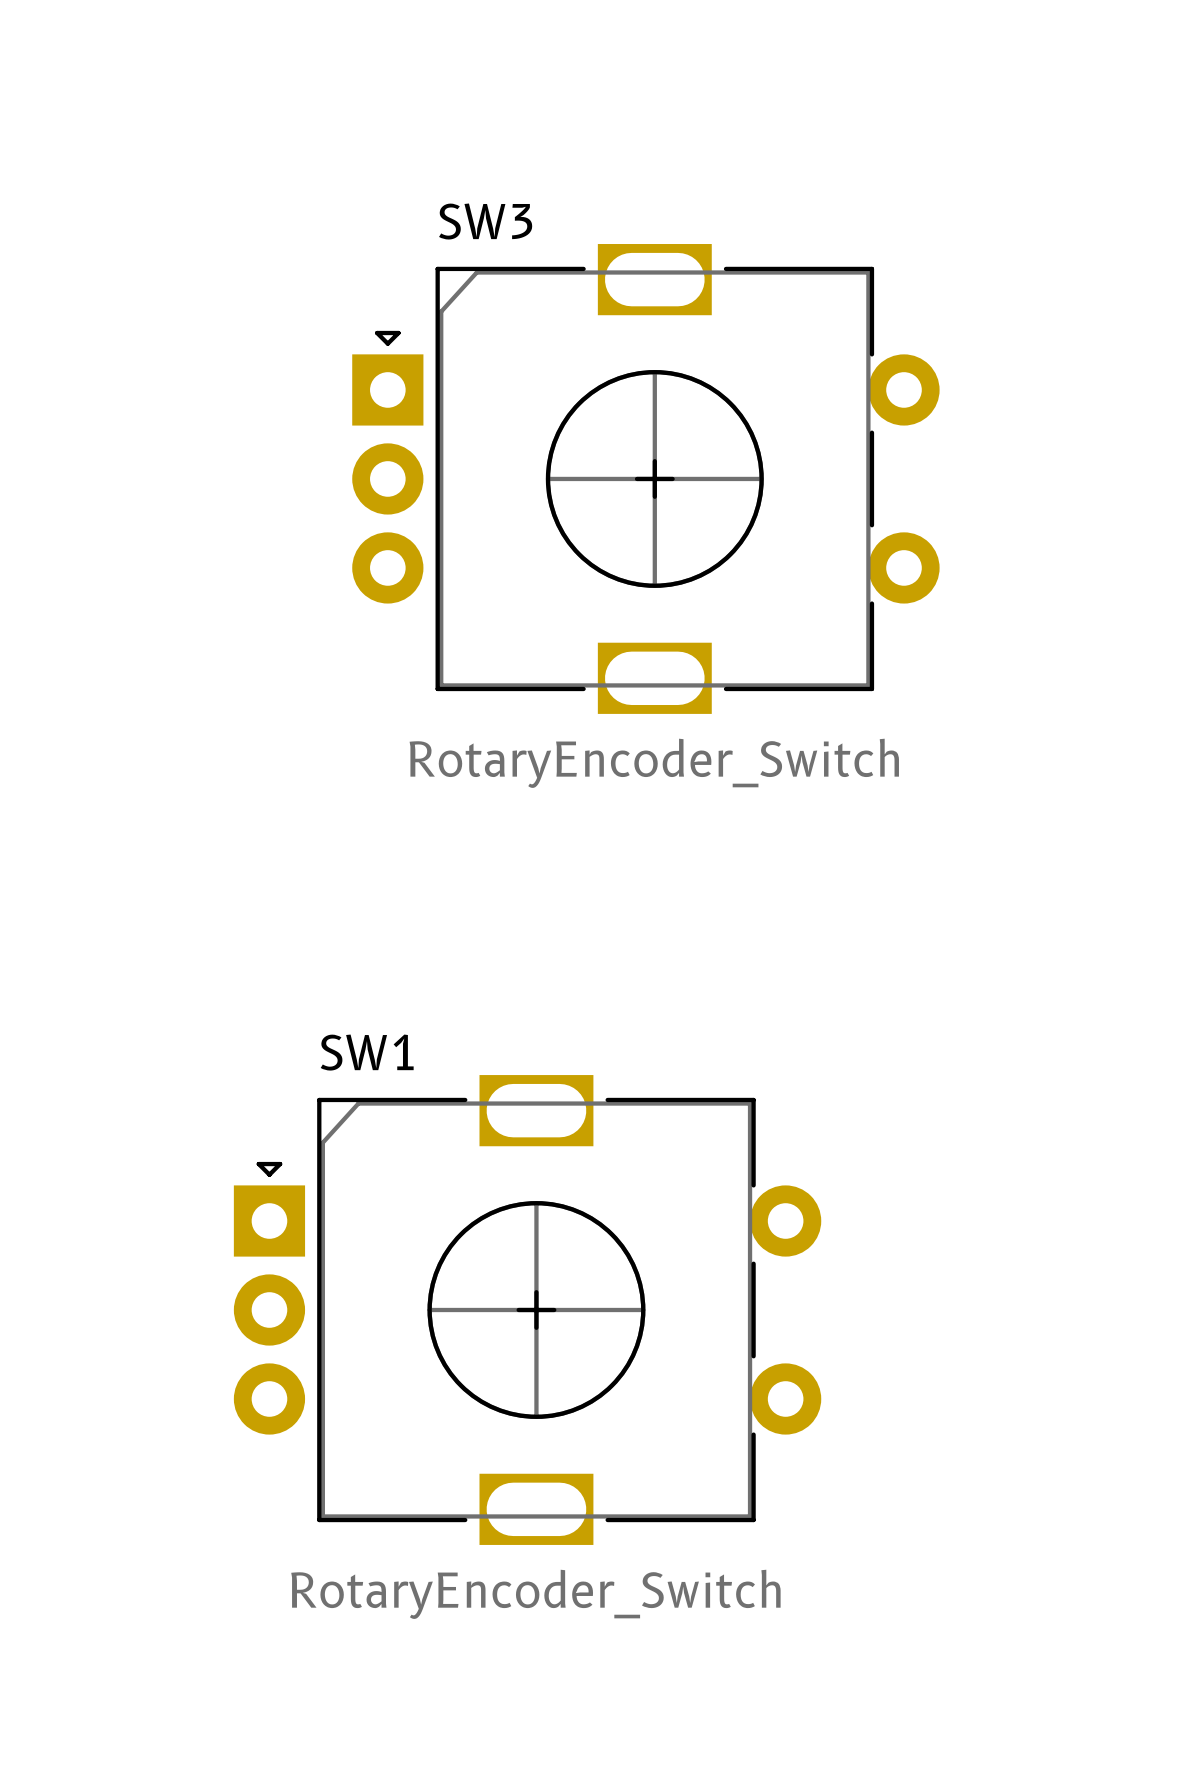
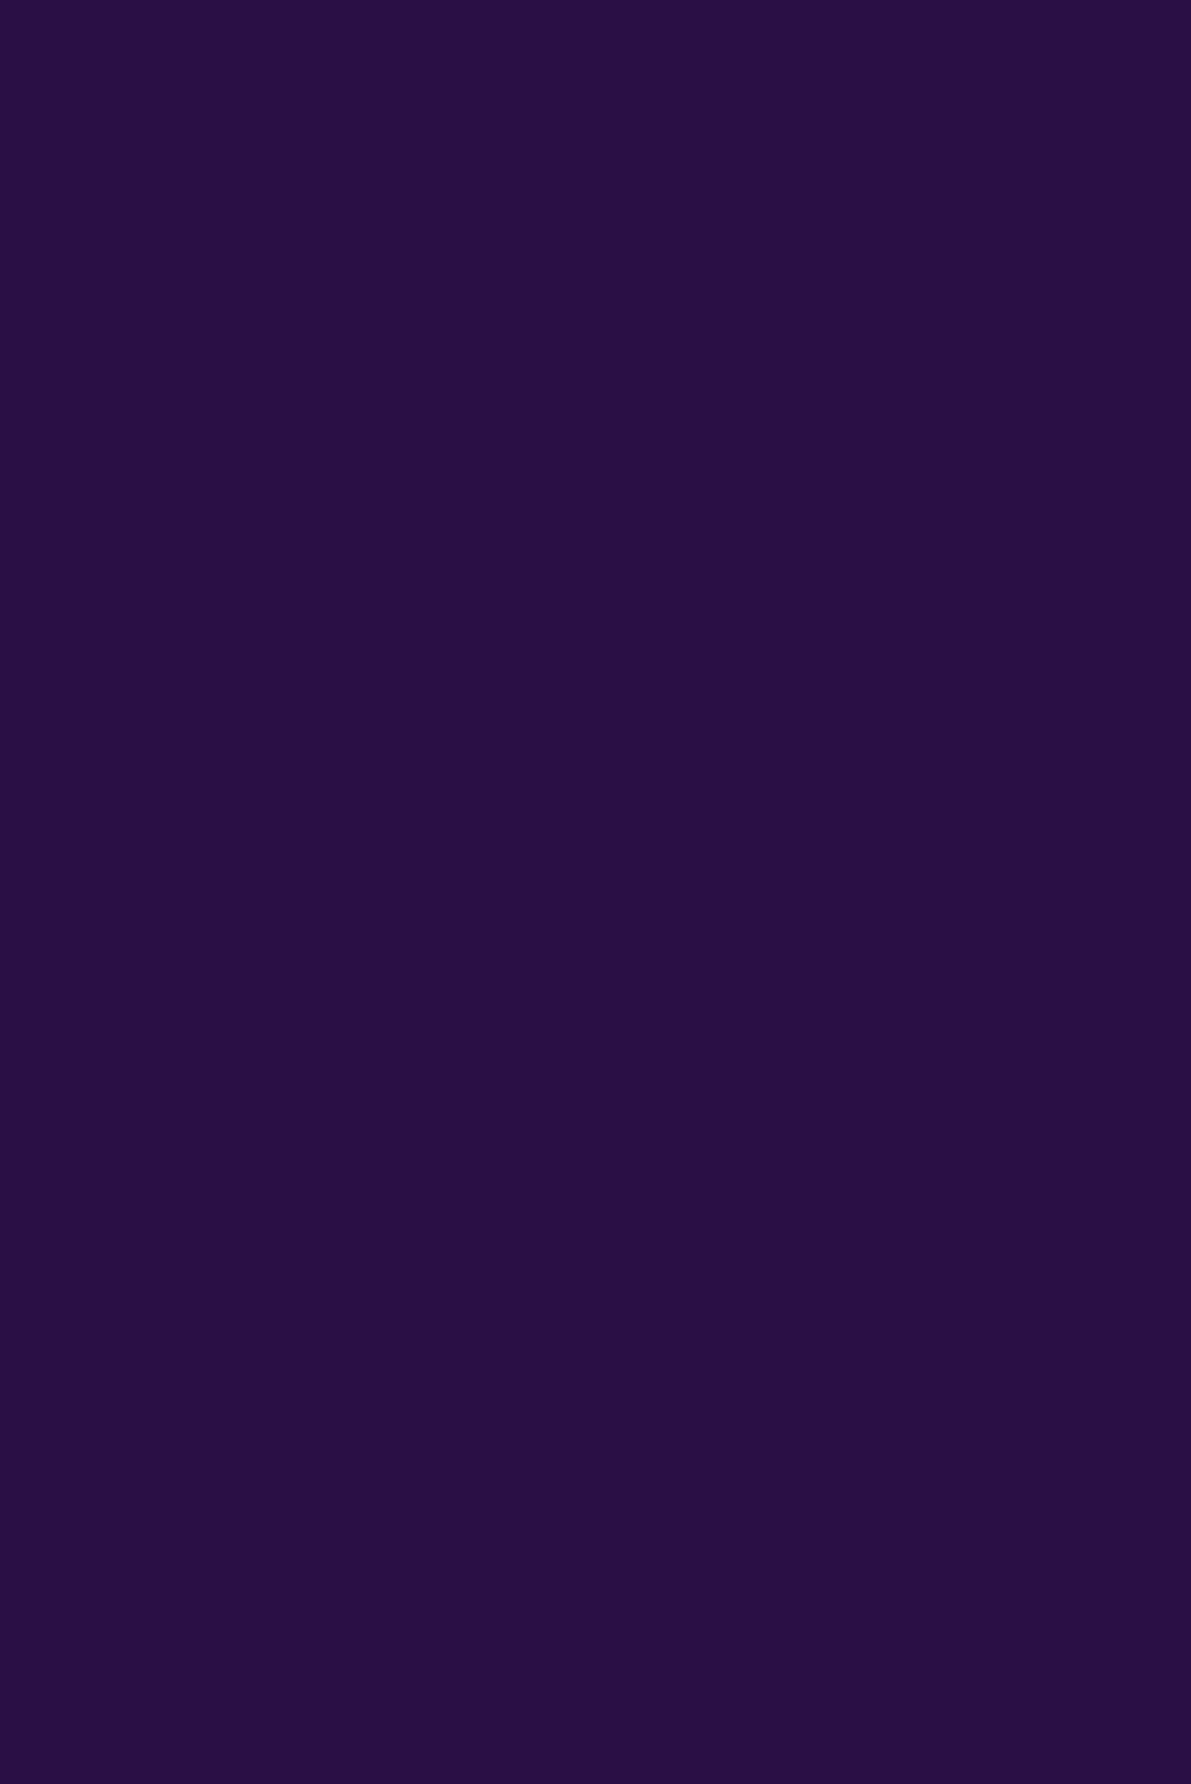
SW3: RotaryEncoder_Switch (645, 478) -> none
SW1: RotaryEncoder_Switch (527, 1310) -> none

